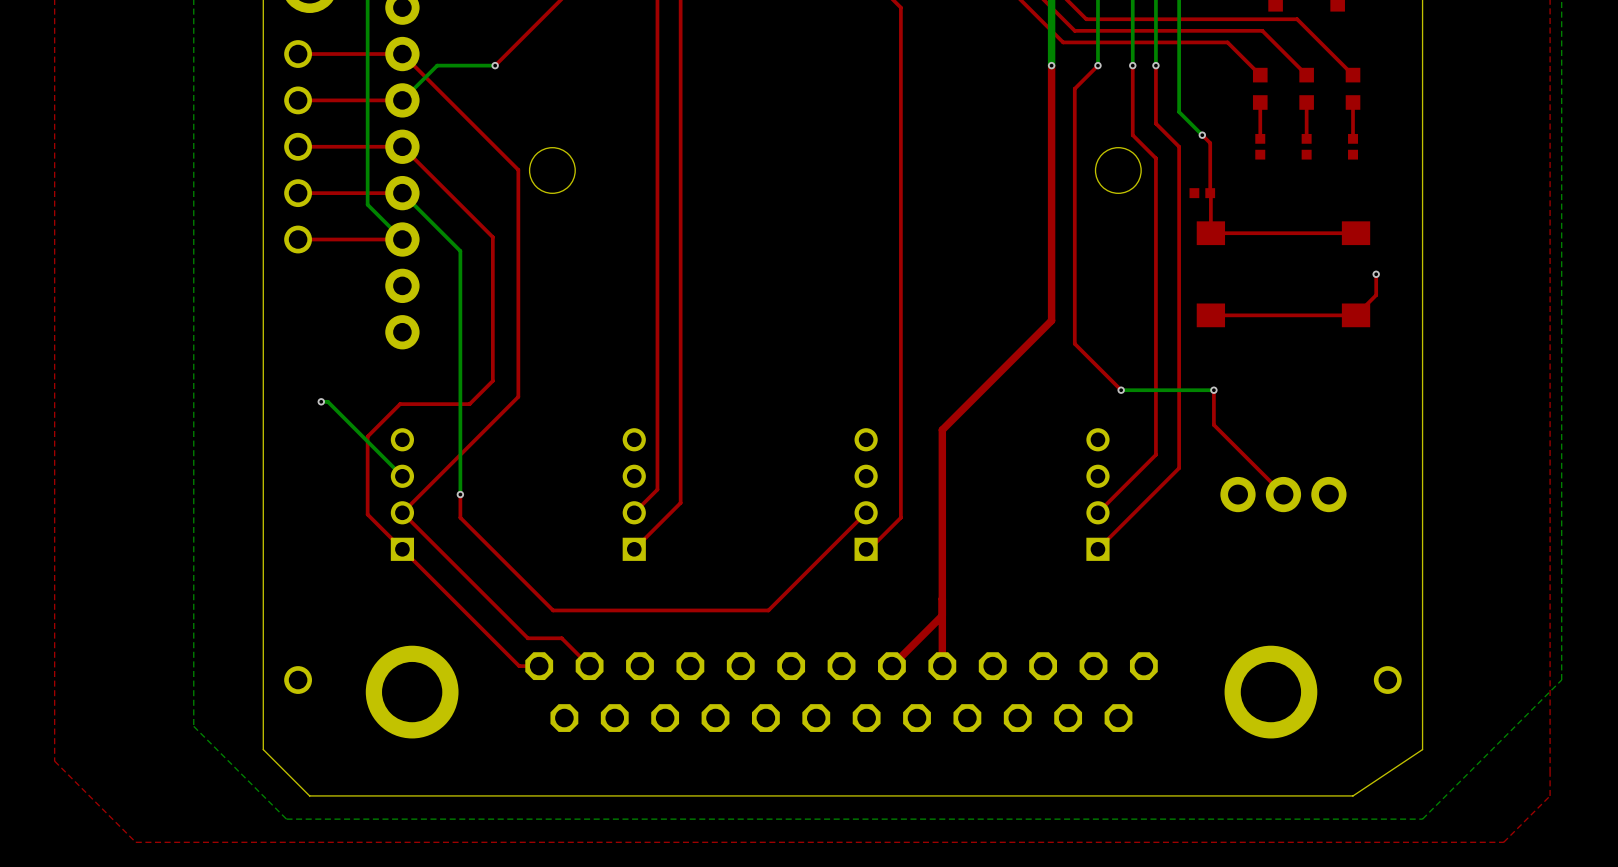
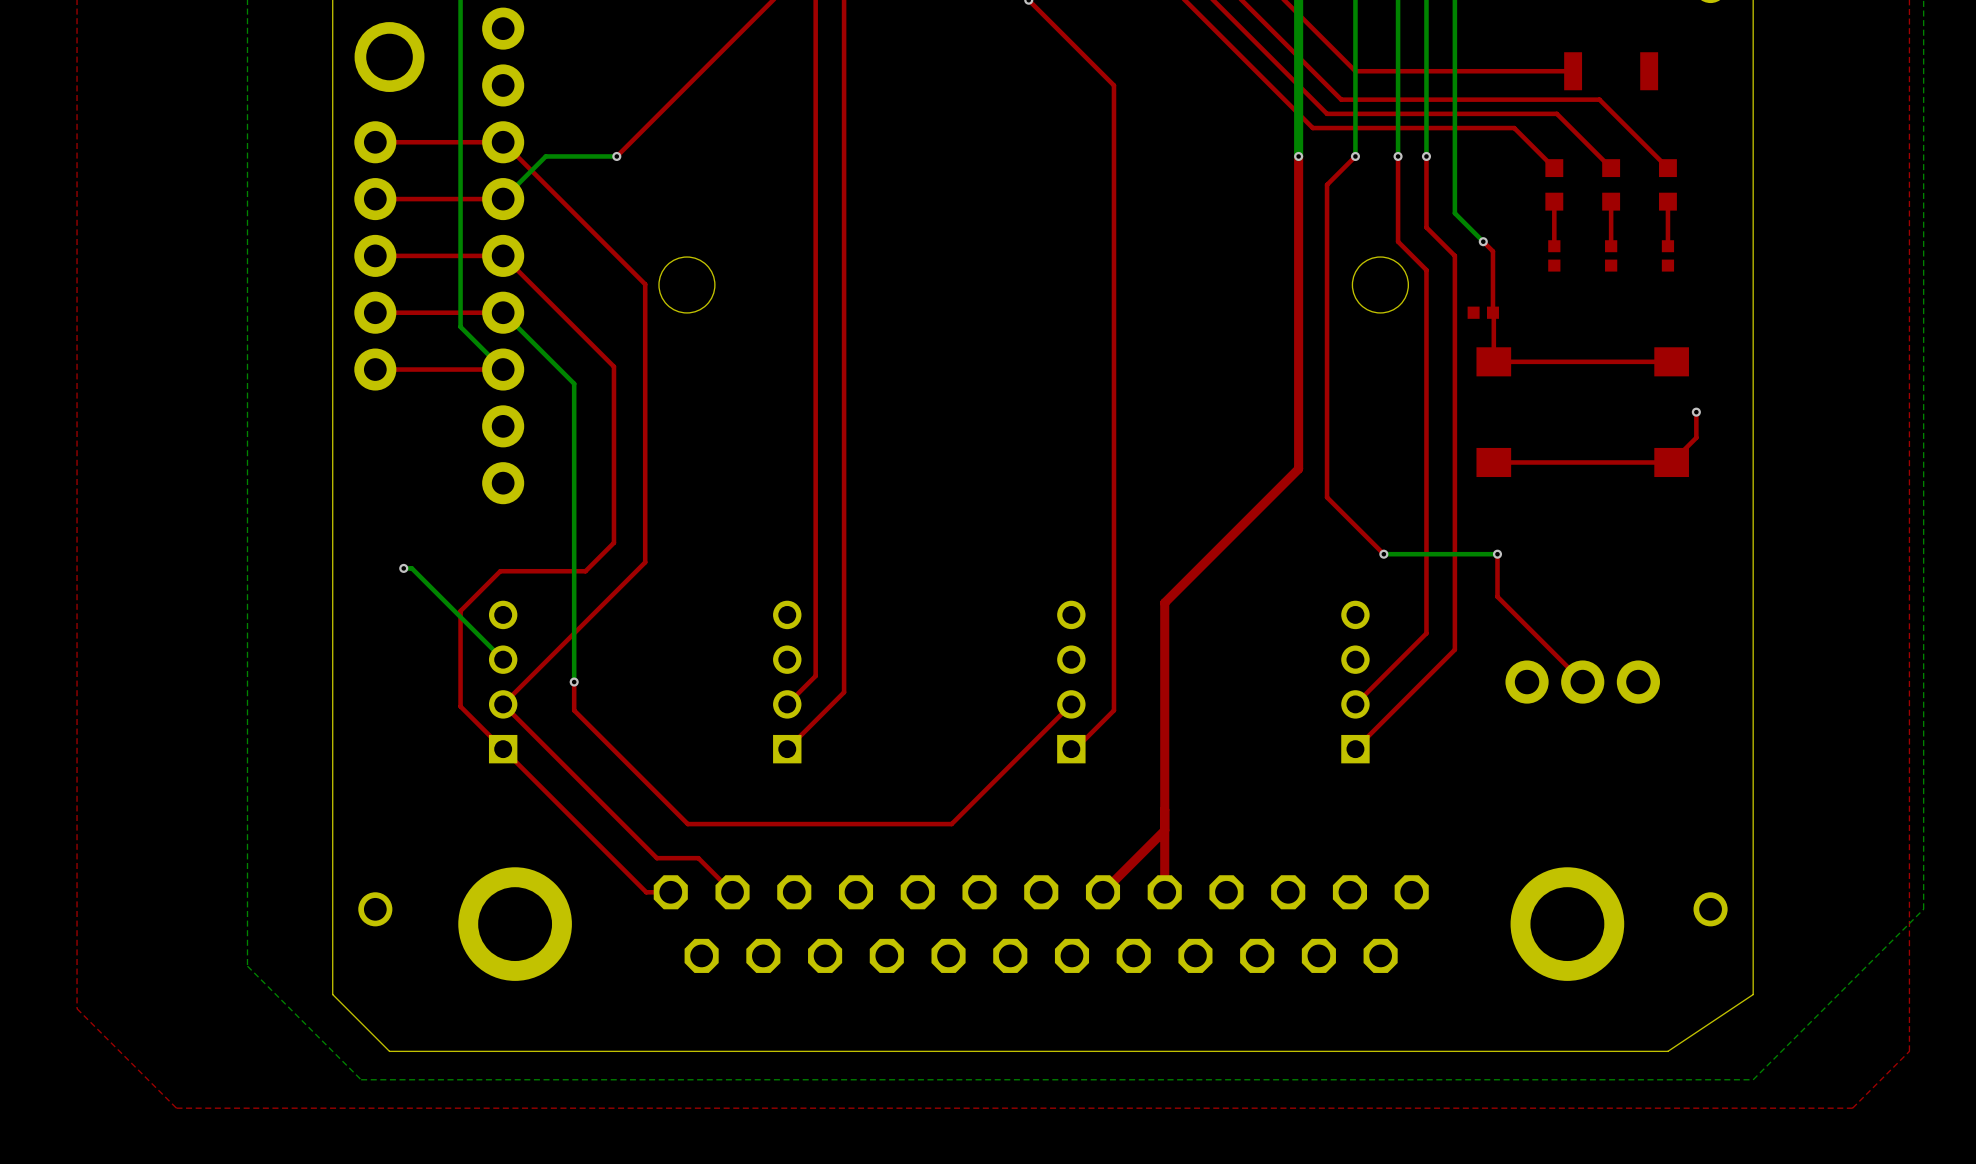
part: (298, 54) -> none
part: (298, 100) -> none
part footprint: [284, 132, 312, 161] -> [354, 121, 397, 391]
part: (298, 193) -> none
part: (298, 239) -> none

